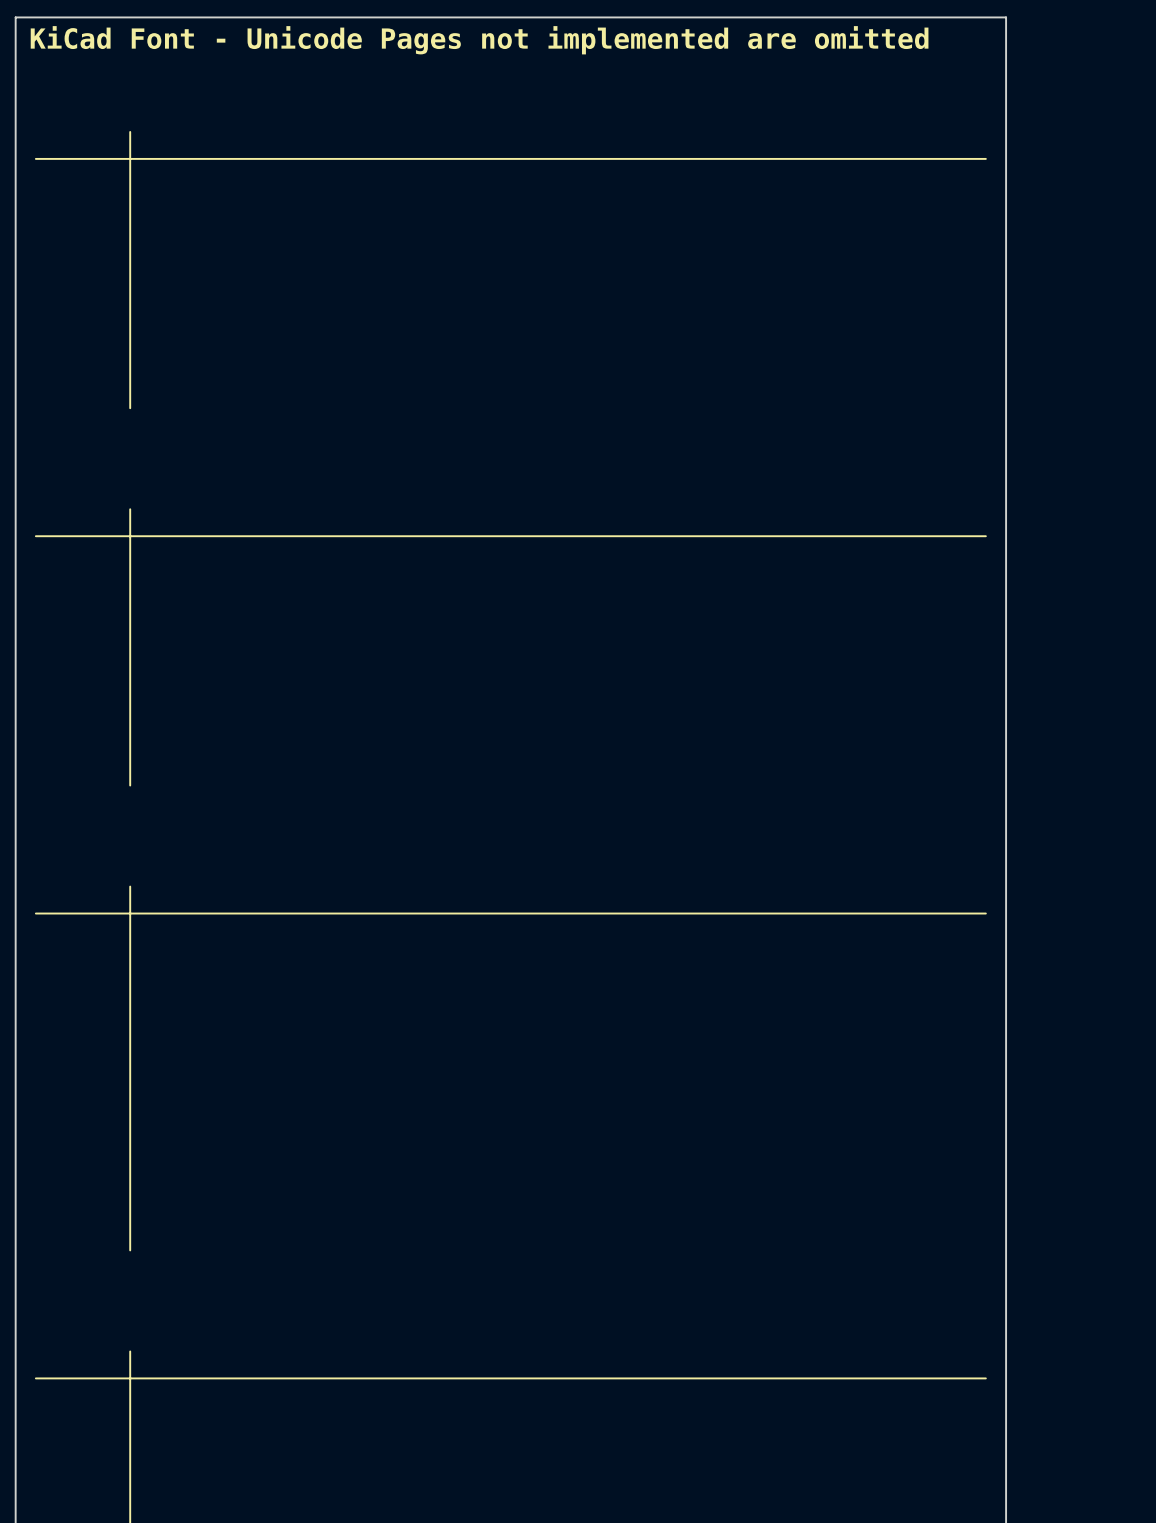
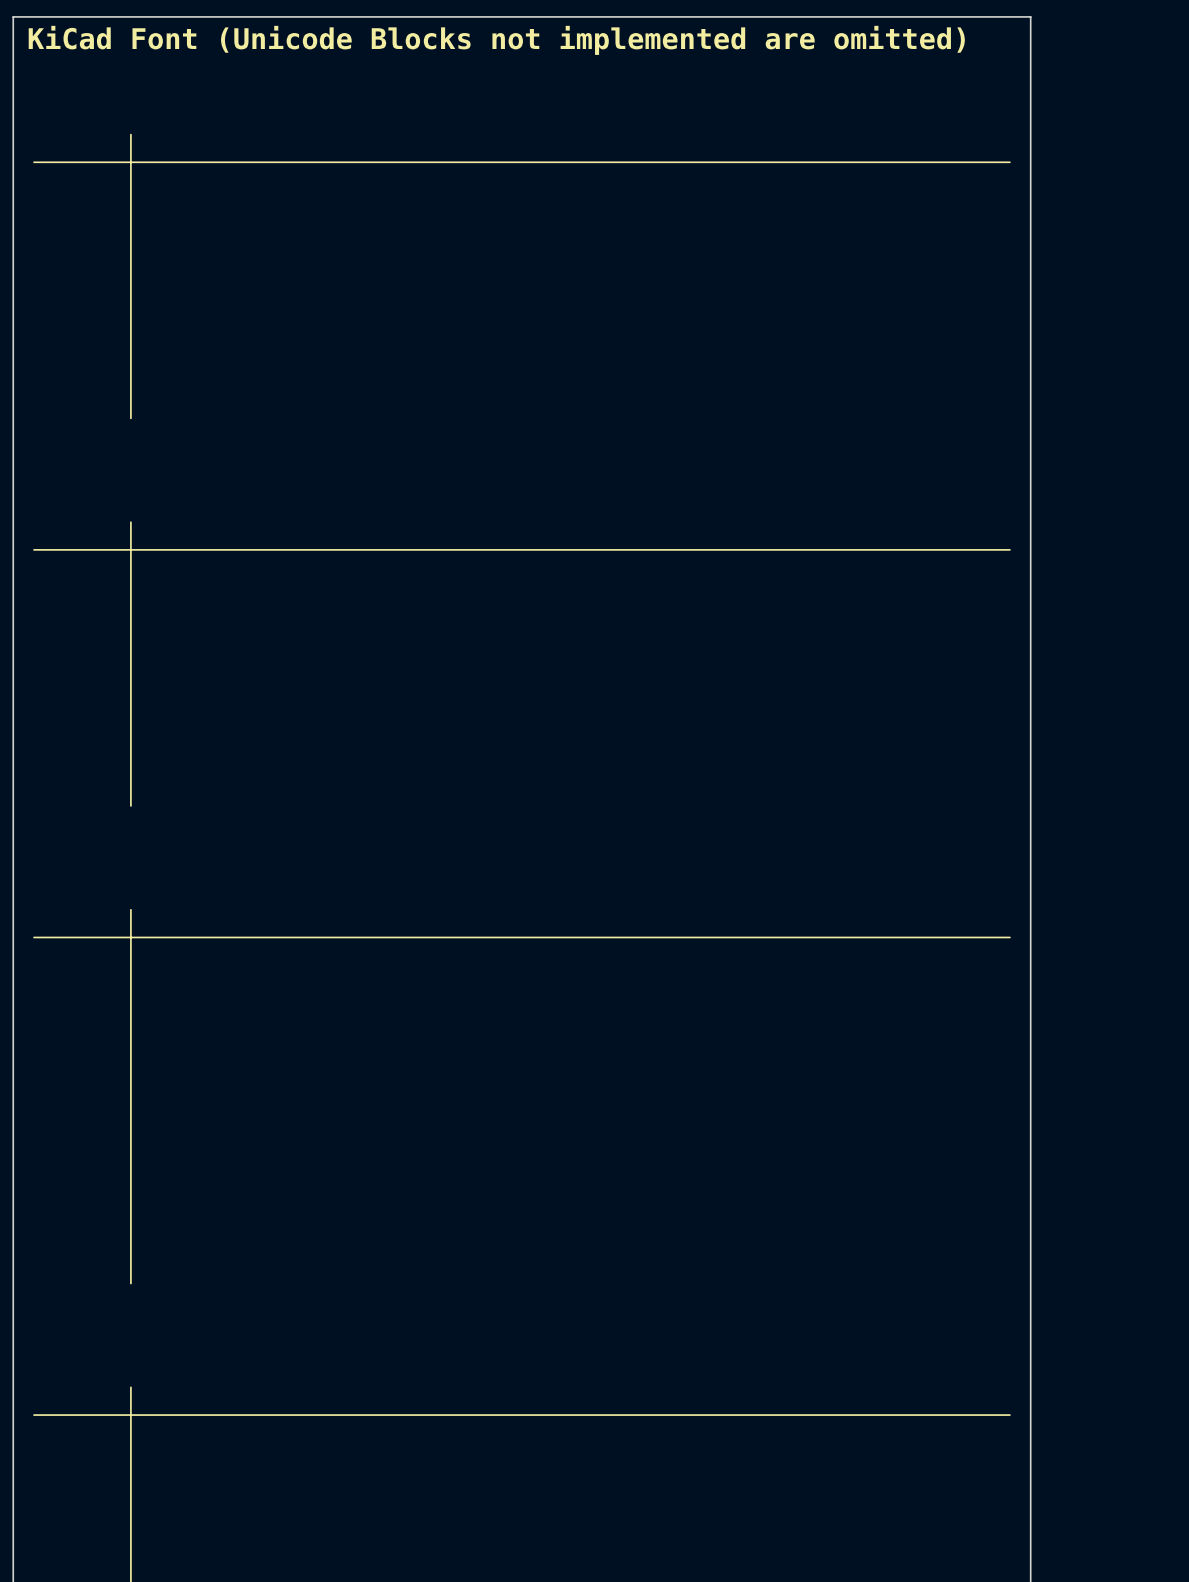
text: KiCad Font - Unicode Pages not implemented are omitted (479, 40) -> KiCad Font (Unicode Blocks not implemented are omitted) (496, 40)

